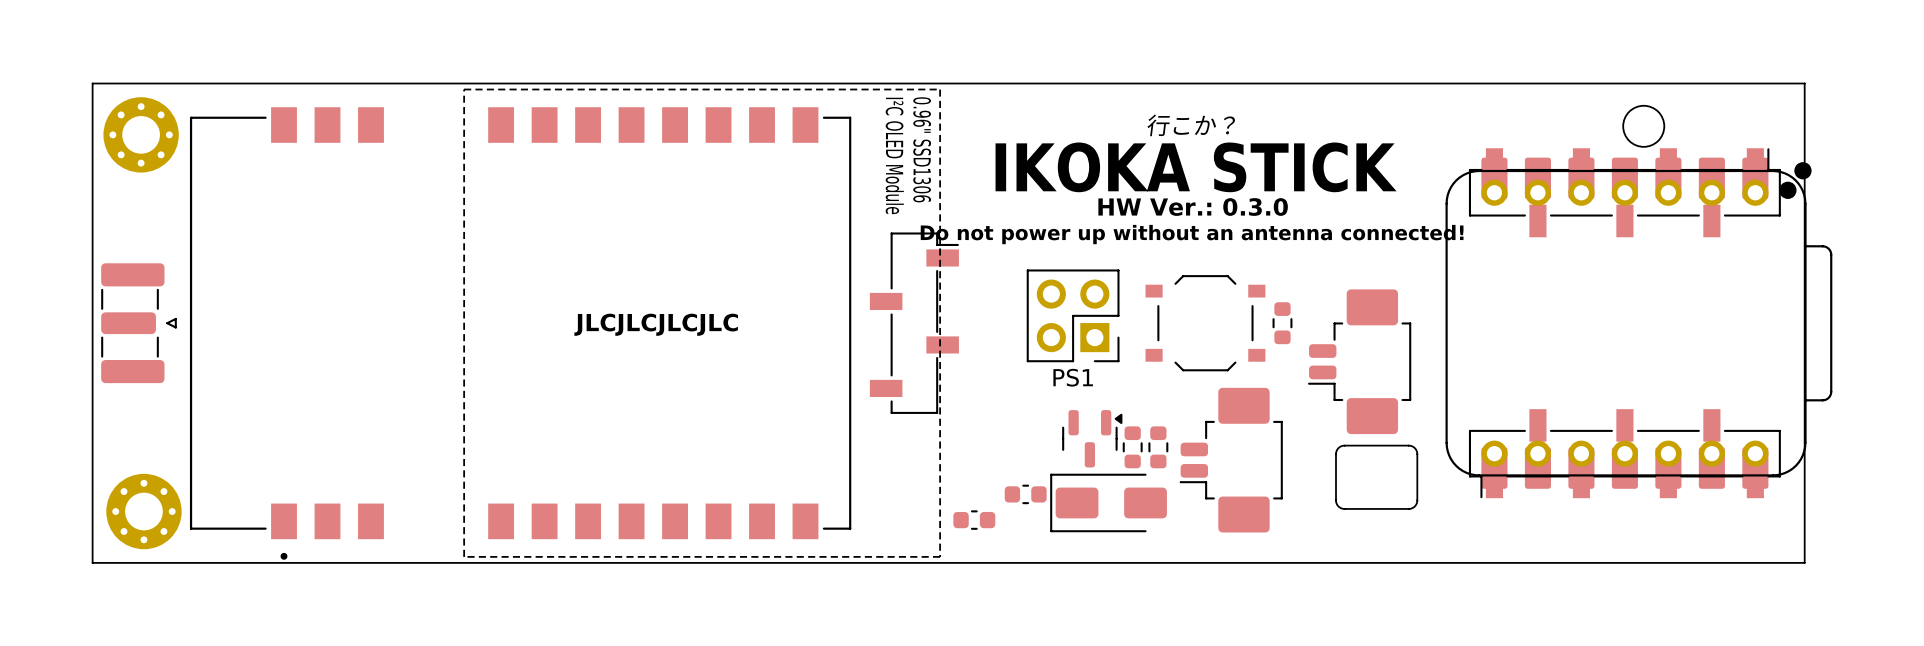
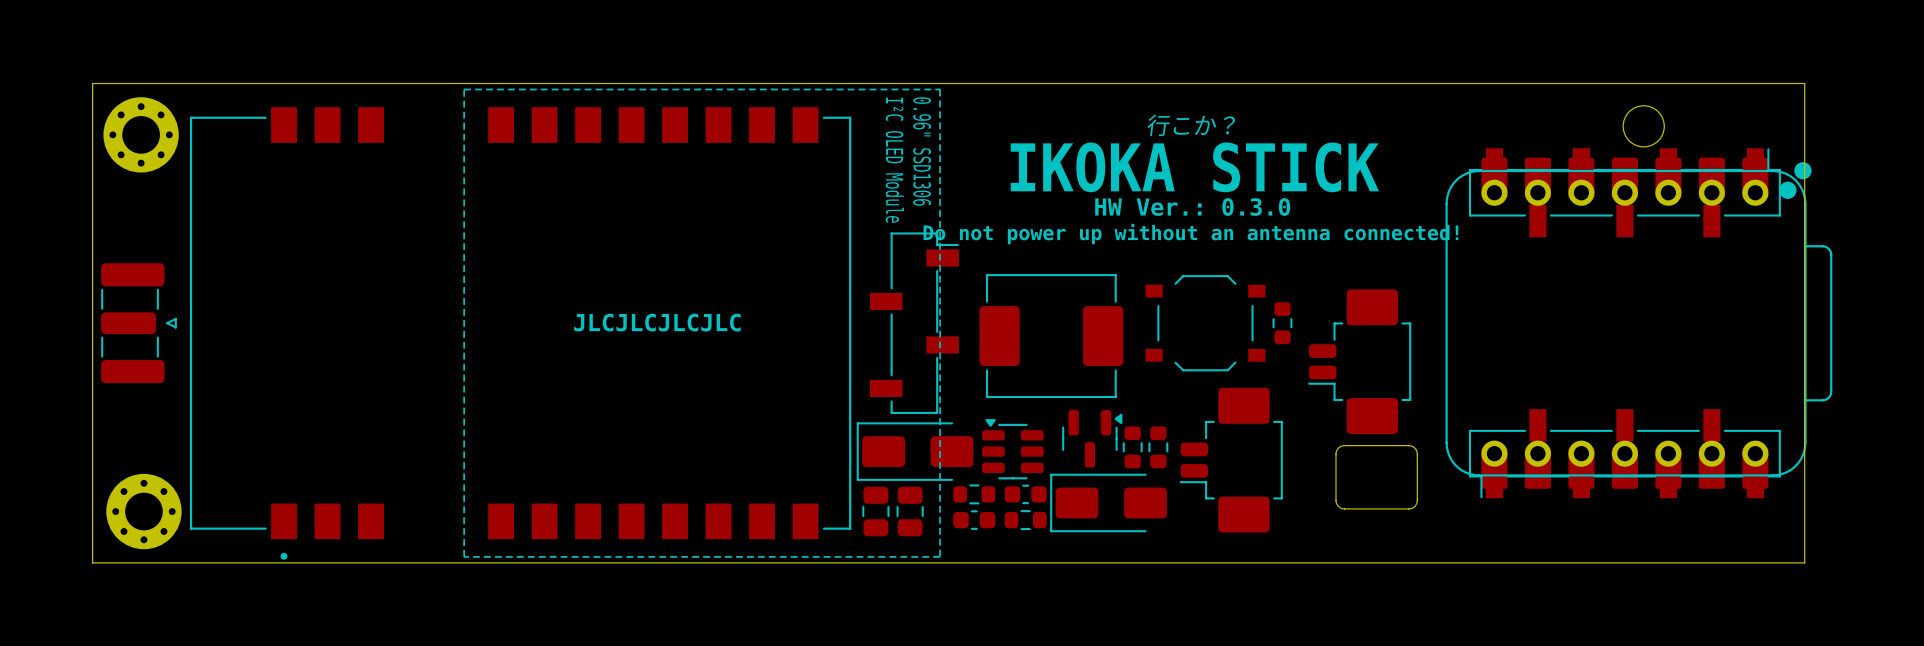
PS1: (1073, 315) -> none
part: none -> (1051, 336)
part: none -> (1012, 449)
part: none -> (915, 451)
part: none -> (974, 494)
part: none -> (875, 511)
part: none -> (910, 511)
part: none -> (1025, 520)

